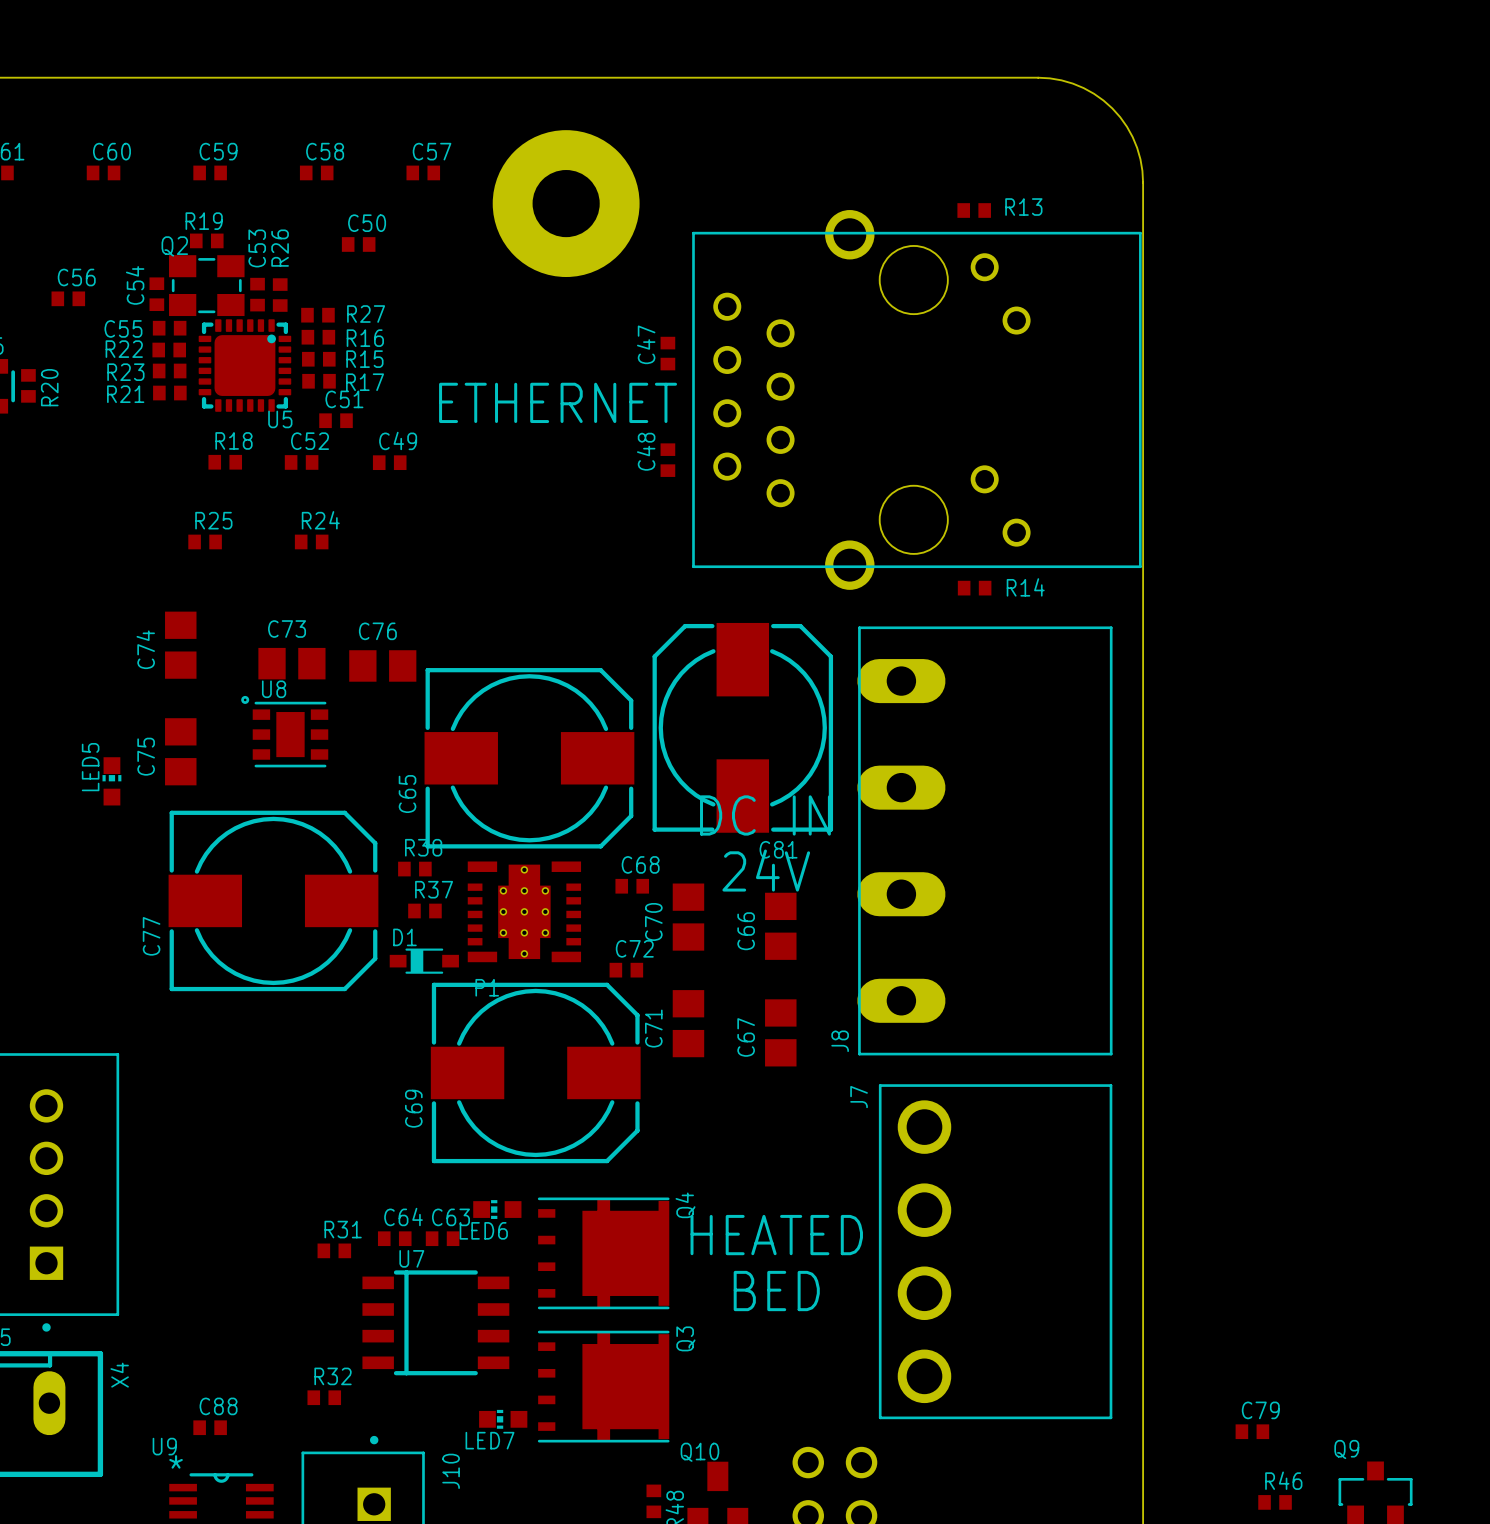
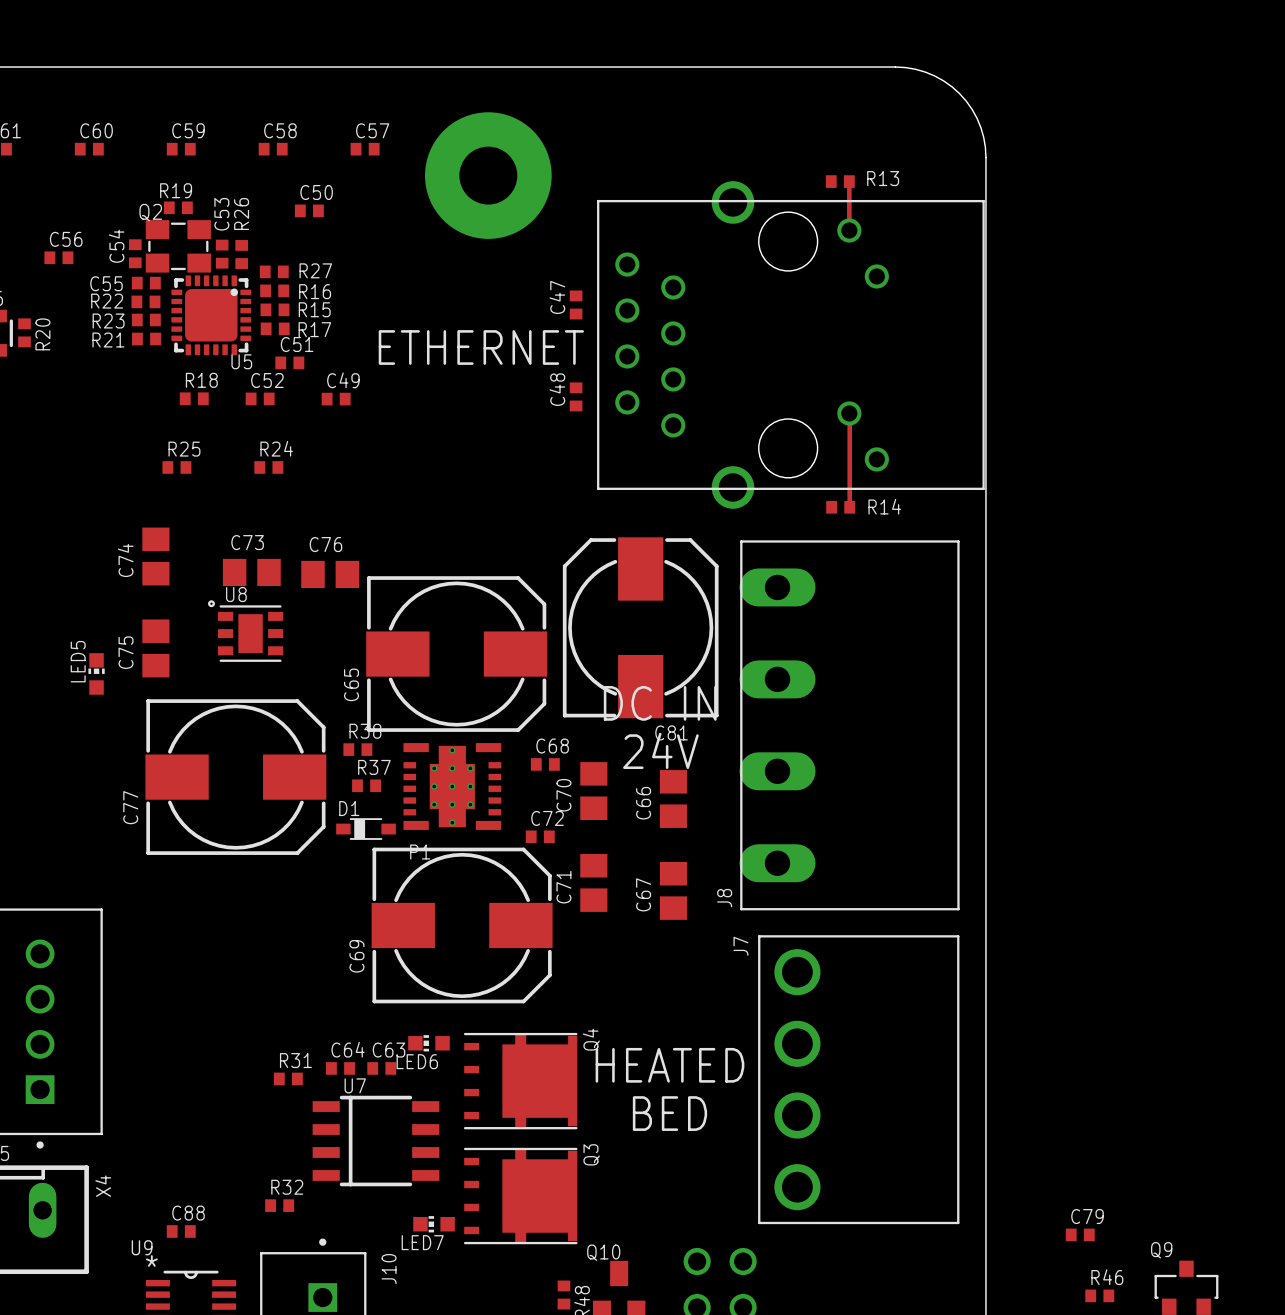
top track: none -> (849, 181) (849, 230)
top track: none -> (849, 413) (849, 507)

